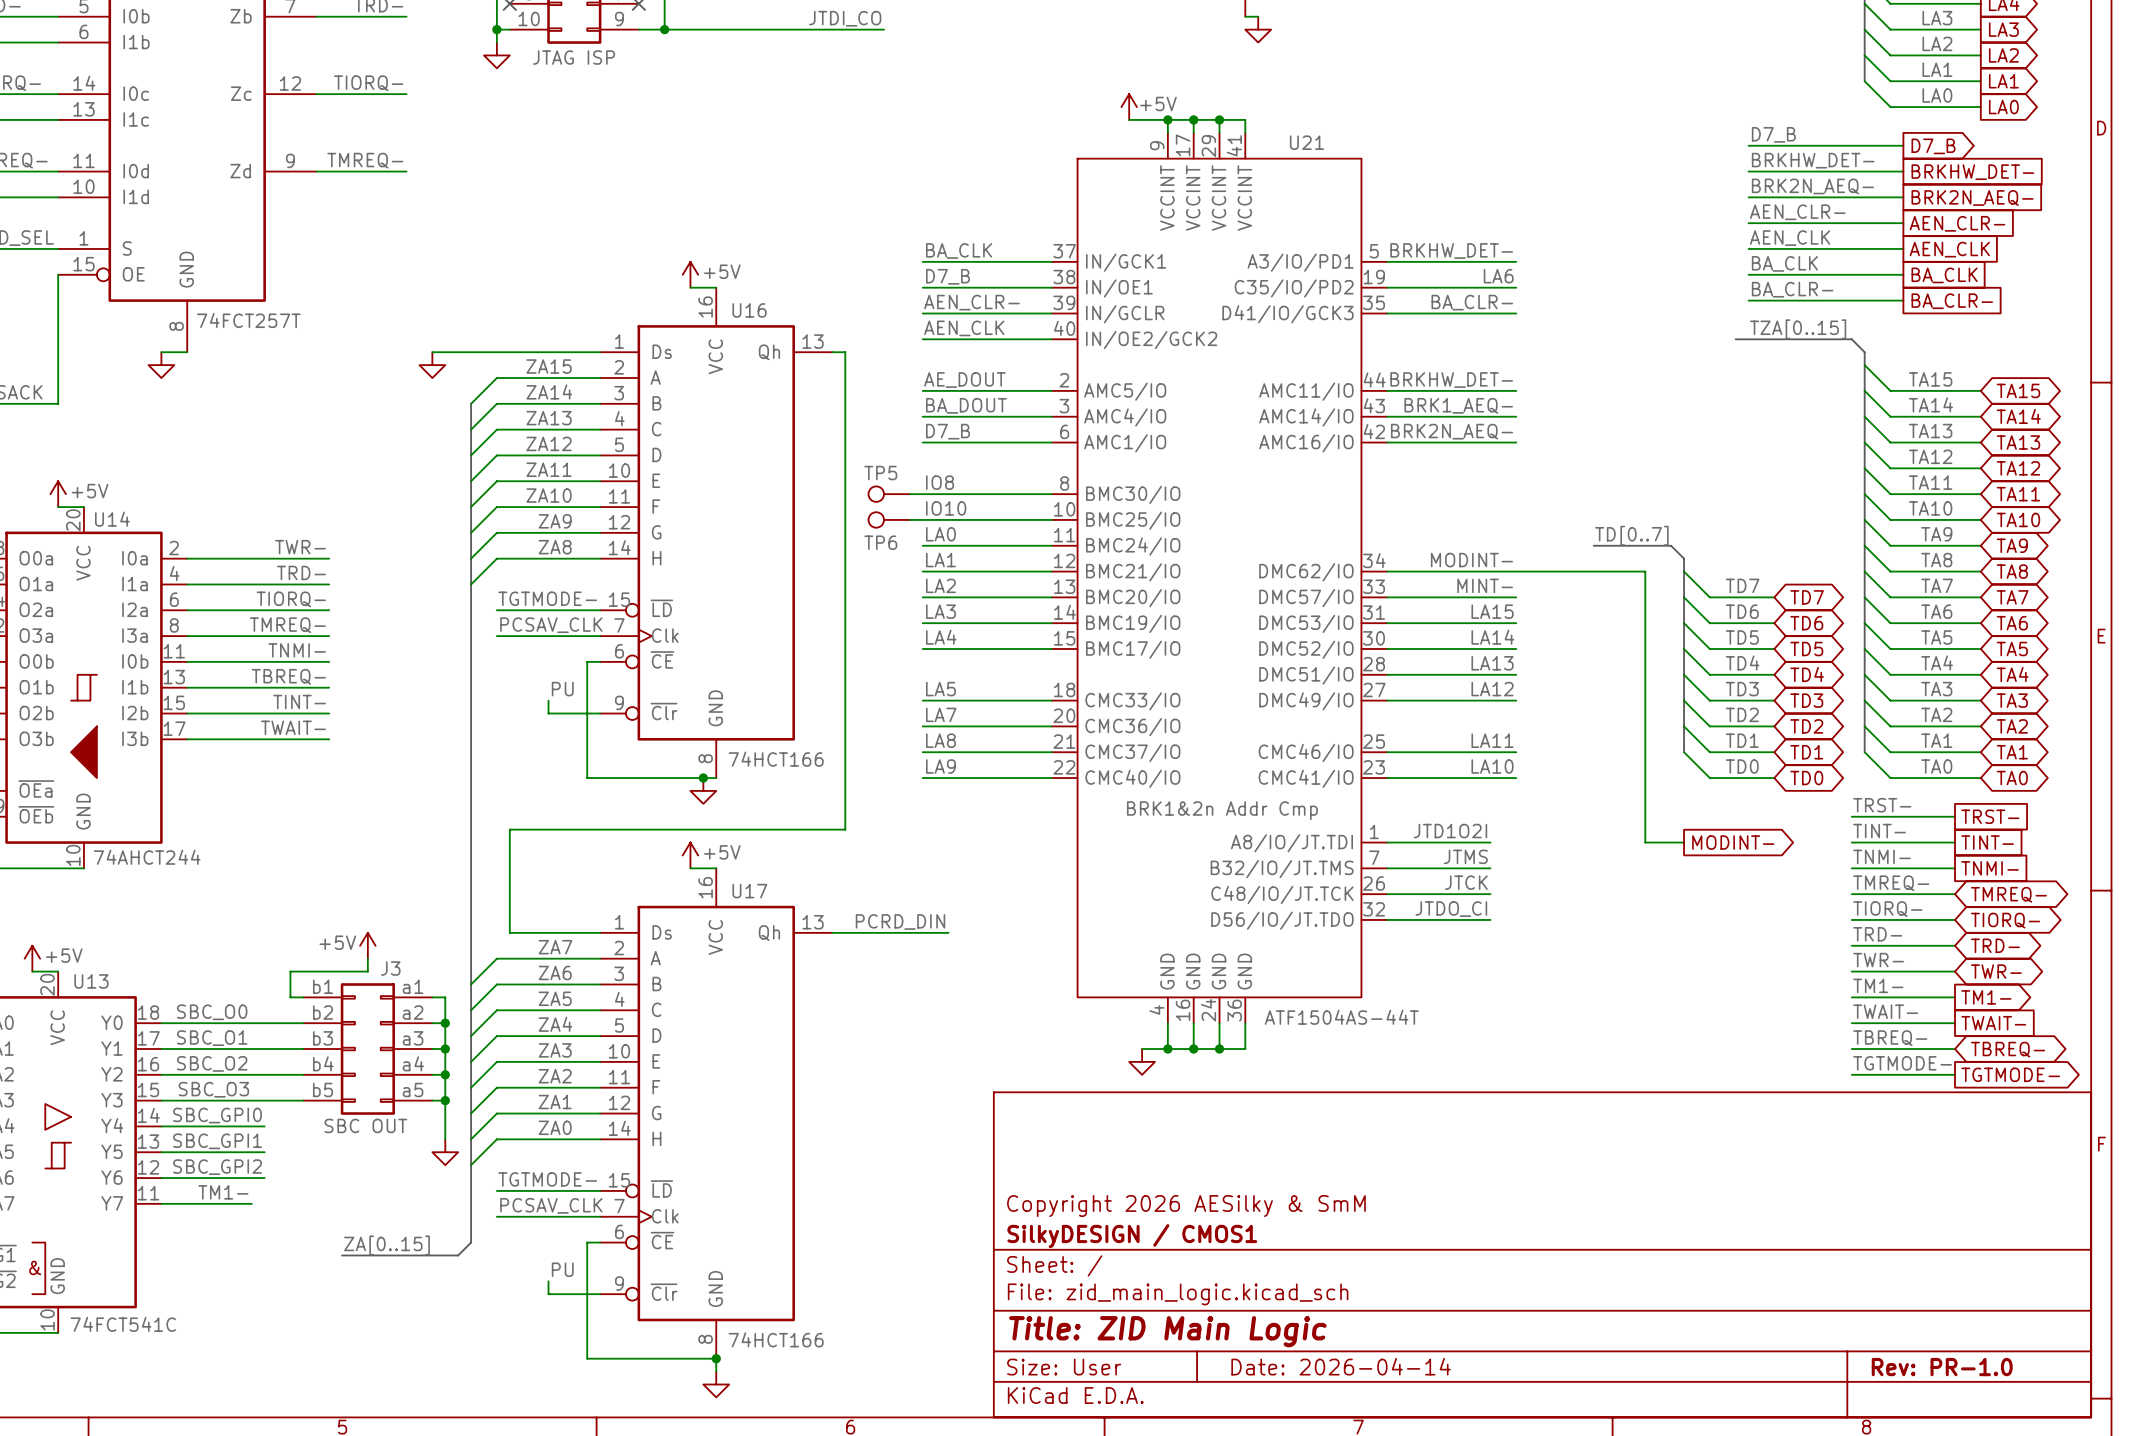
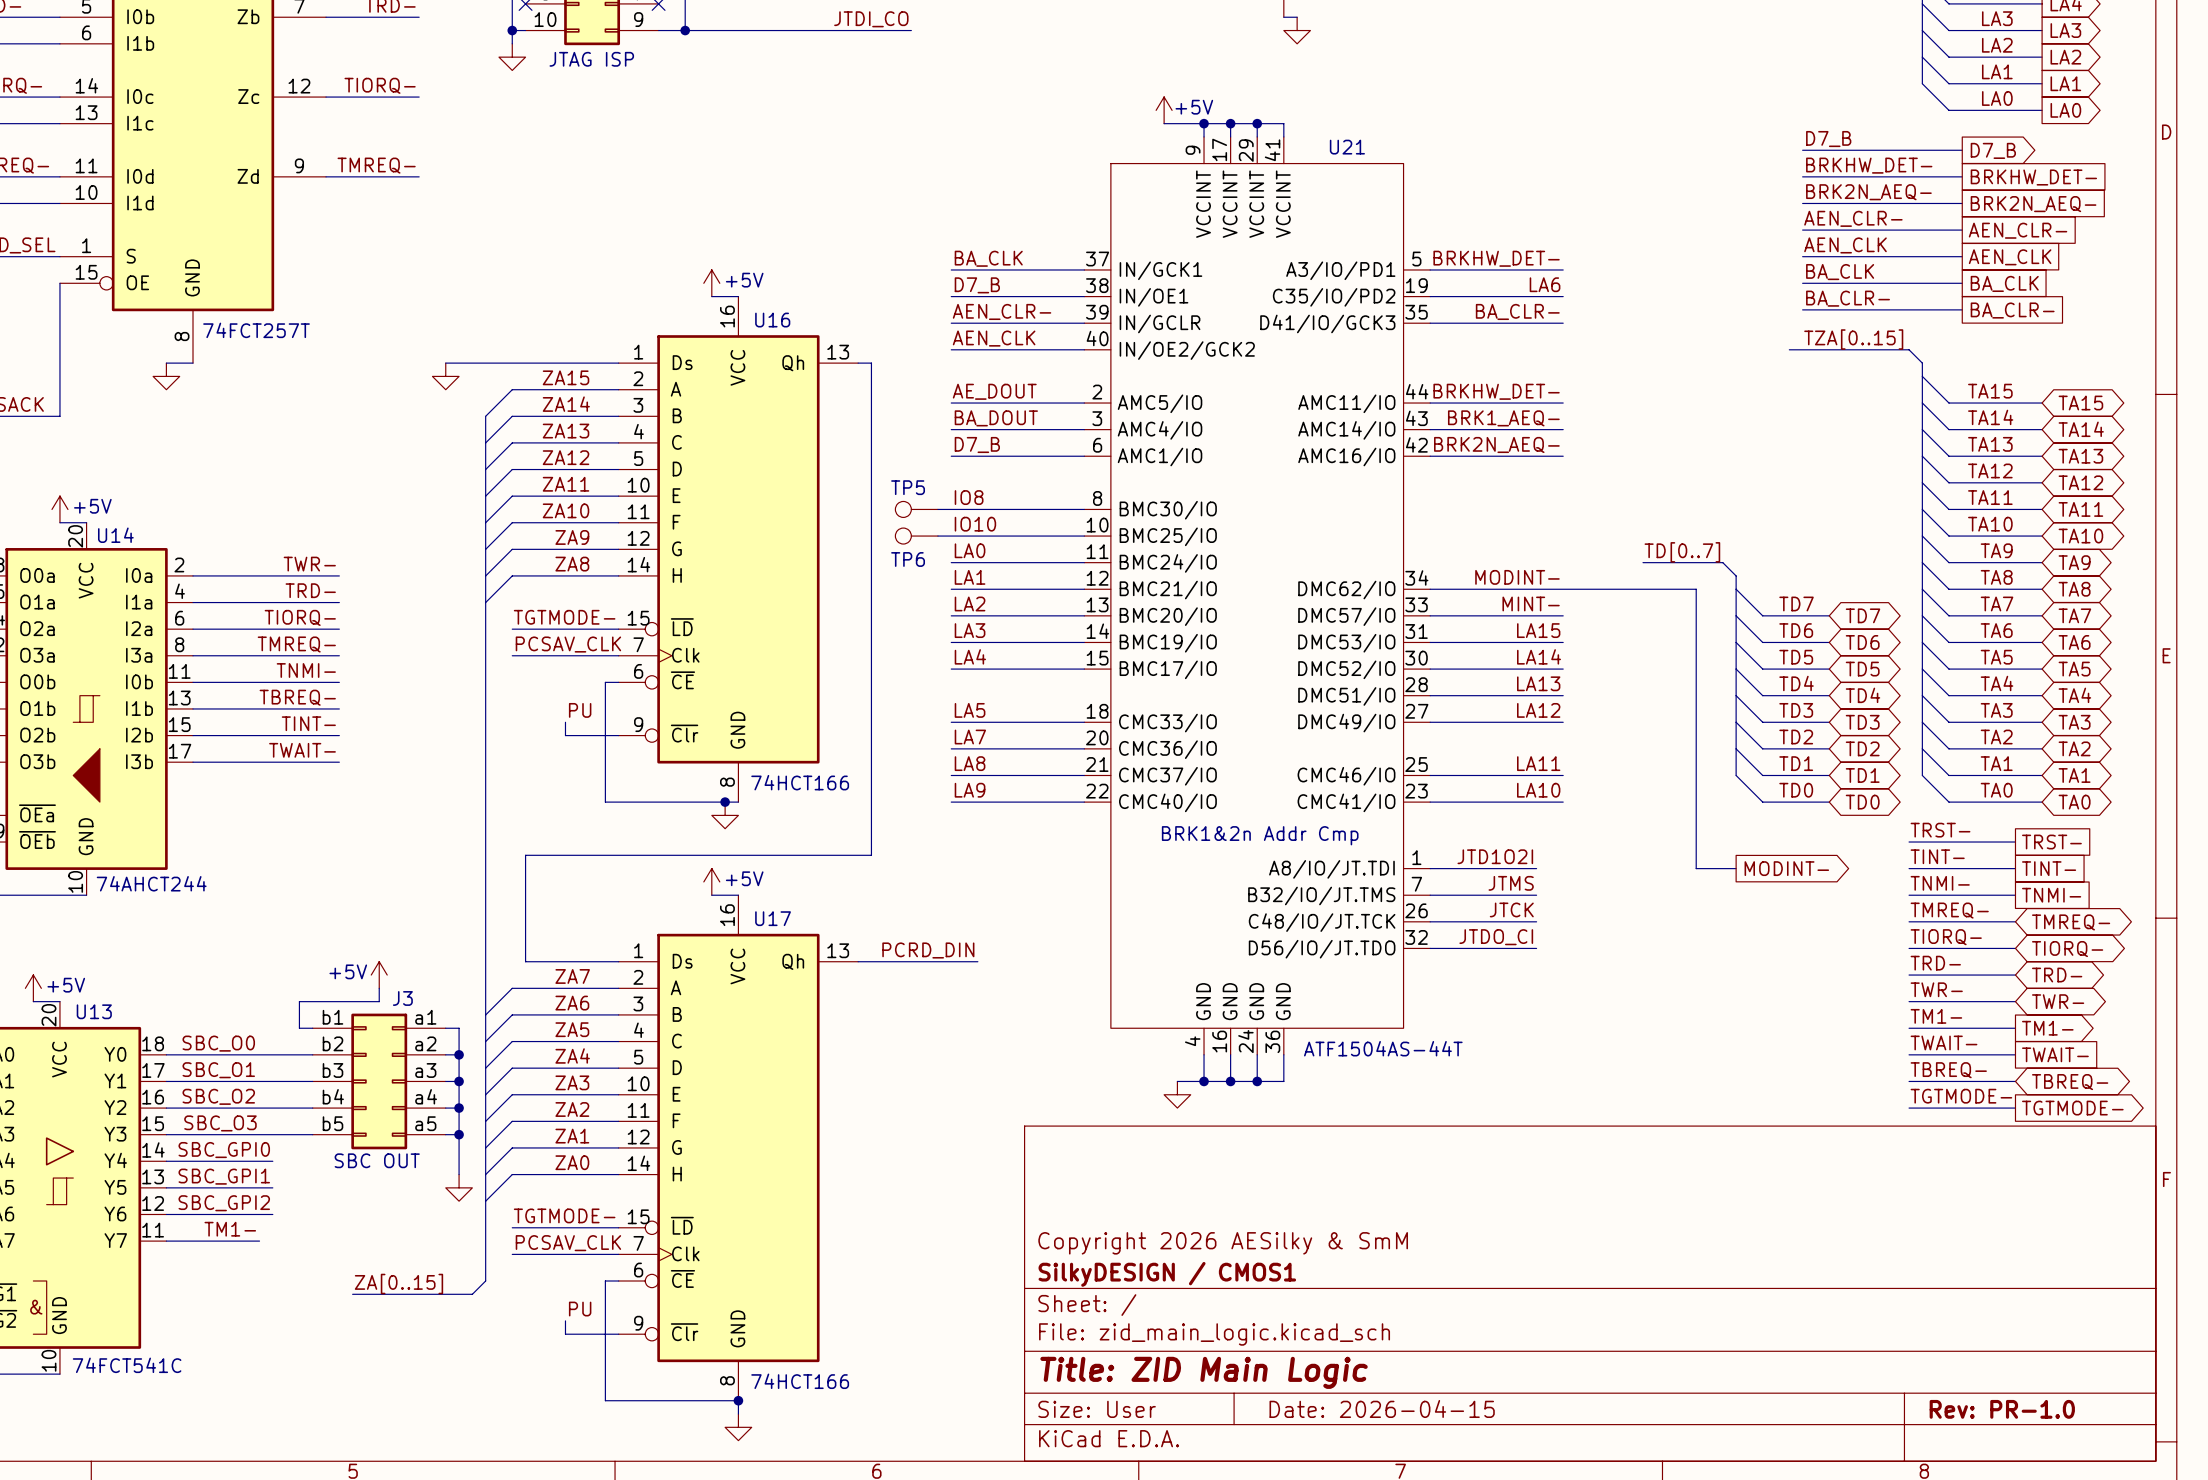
title block: Date: 2026-04-14 (1341, 1366) -> Date: 2026-04-15 (1382, 1408)

